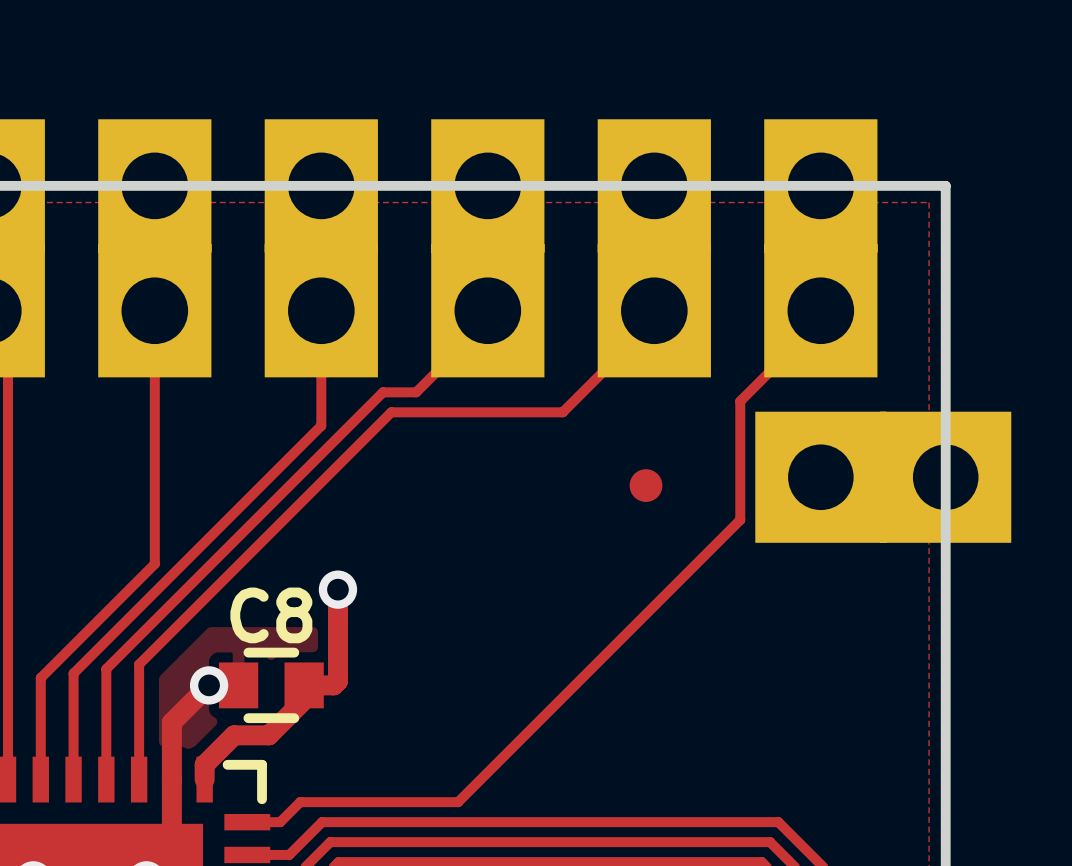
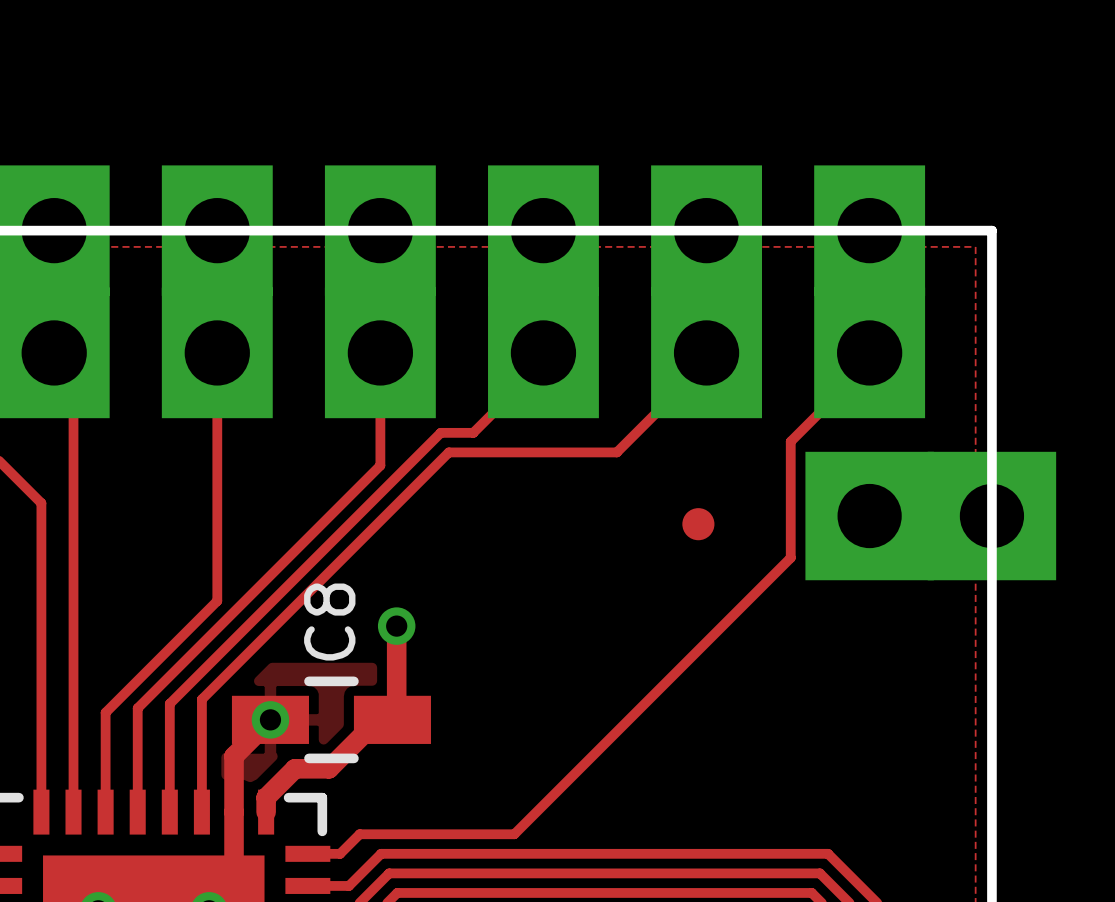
C8 name rotation: 0° (271, 615) -> 90° counterclockwise (329, 622)
C8 footprint: [218, 647, 324, 724] -> [231, 676, 431, 764]

